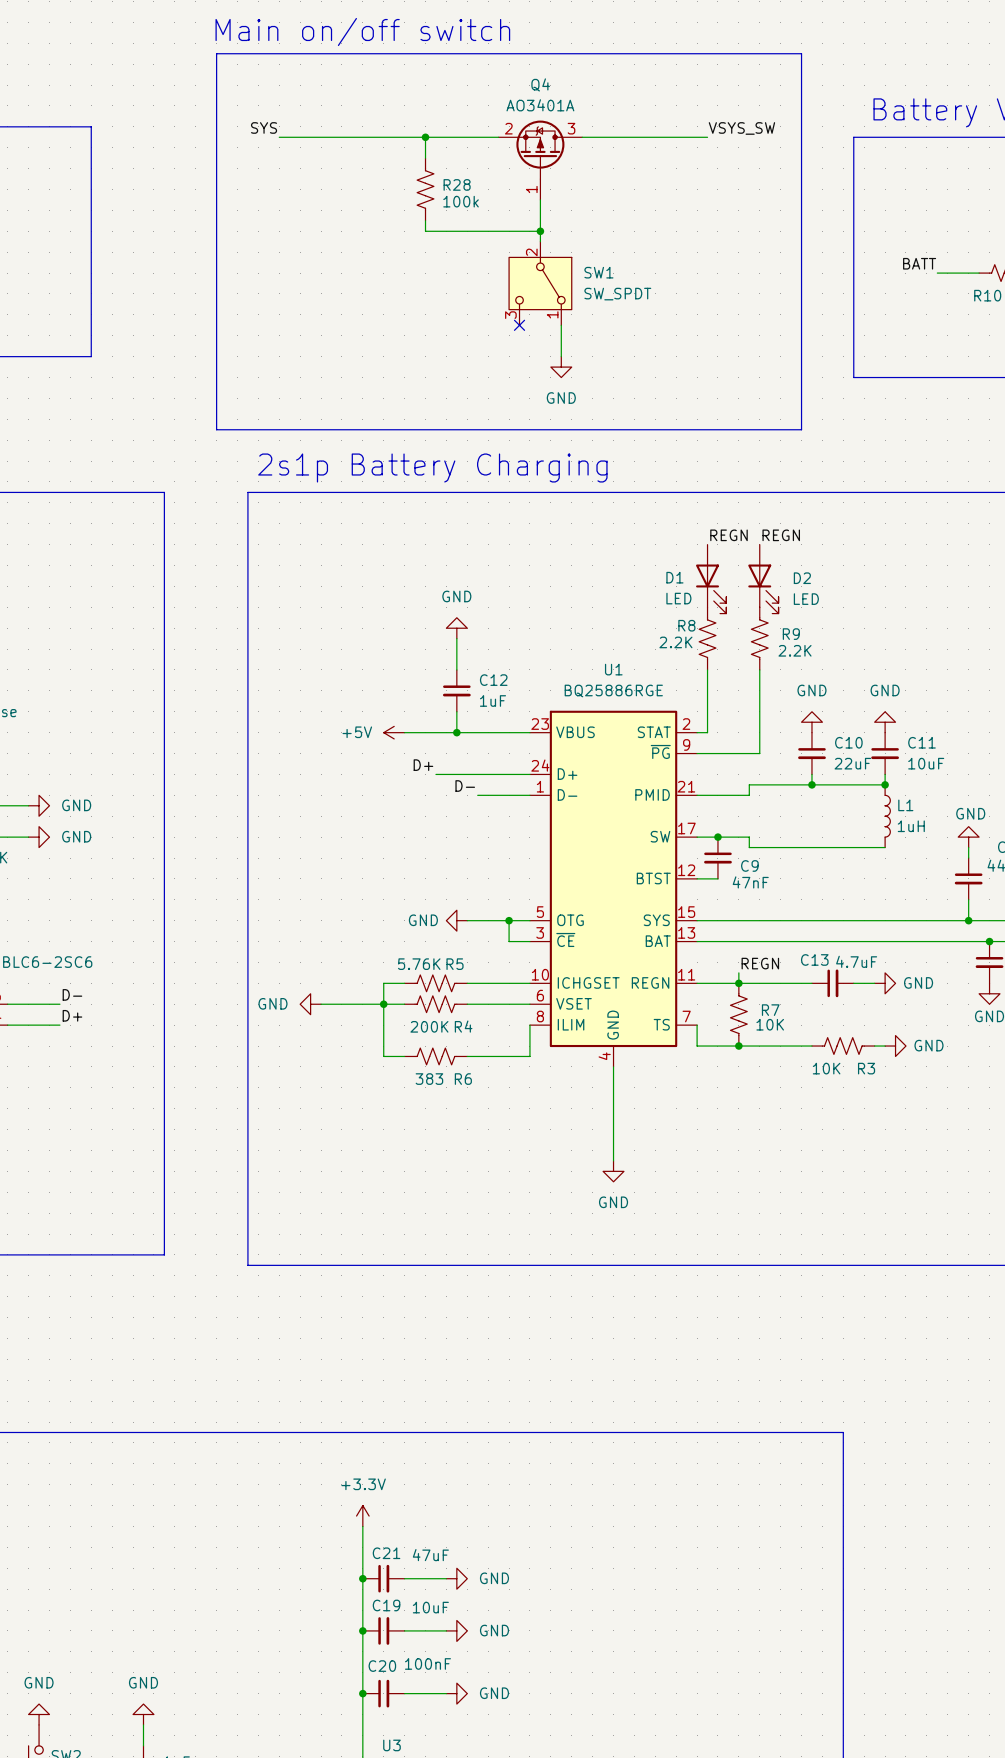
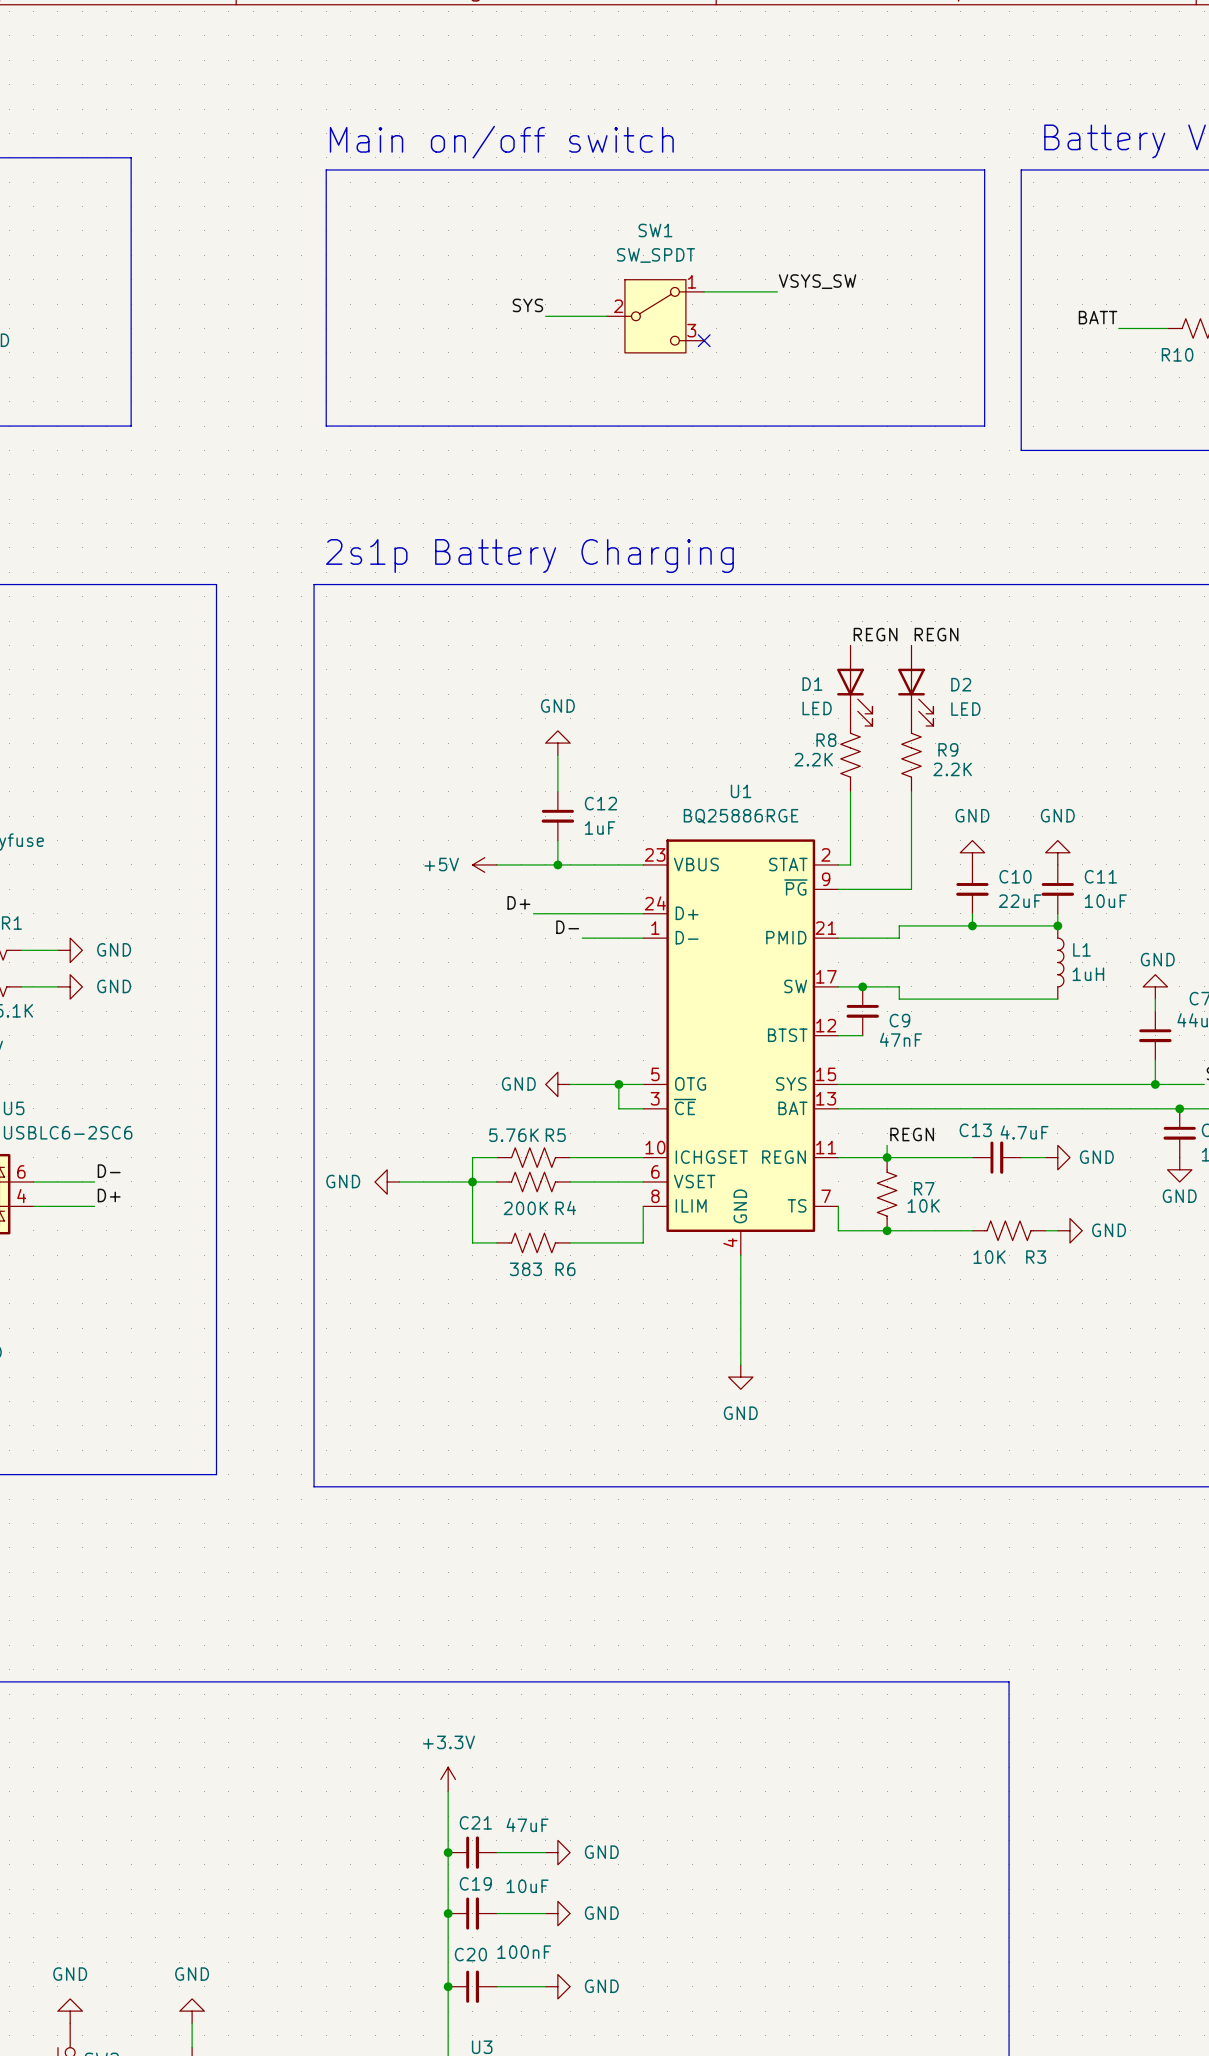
text position: Main on/off switch (362, 31) -> Main on/off switch (501, 142)
line: (216, 53) (801, 53) (801, 429) (216, 429) (216, 53) -> (326, 169) (326, 426) (984, 426) (984, 169) (326, 169)
label: SYS (264, 127) -> none
label position: VSYS_SW (741, 128) -> VSYS_SW (817, 281)
wire: (425, 137) (425, 158) -> none
junction: (425, 137) -> none
Q4: AO3401A (540, 160) -> none
R28: 100k (425, 189) -> none
wire: (540, 199) (540, 241) -> none
wire: (425, 220) (425, 231) (540, 231) -> none
junction: (540, 231) -> none
wire: none -> (704, 291) (777, 291)
label: none -> SYS (527, 305)
wire: none -> (545, 316) (606, 316)
SW1 rotation: 0° (540, 283) -> 90° counterclockwise (655, 316)
no-connect mark: none -> (704, 340)
SW1 value position: SW_SPDT (617, 294) -> SW_SPDT (656, 255)
no-connect mark: (519, 325) -> none
wire: (561, 325) (561, 356) -> none
power symbol: GND (561, 367) -> none

